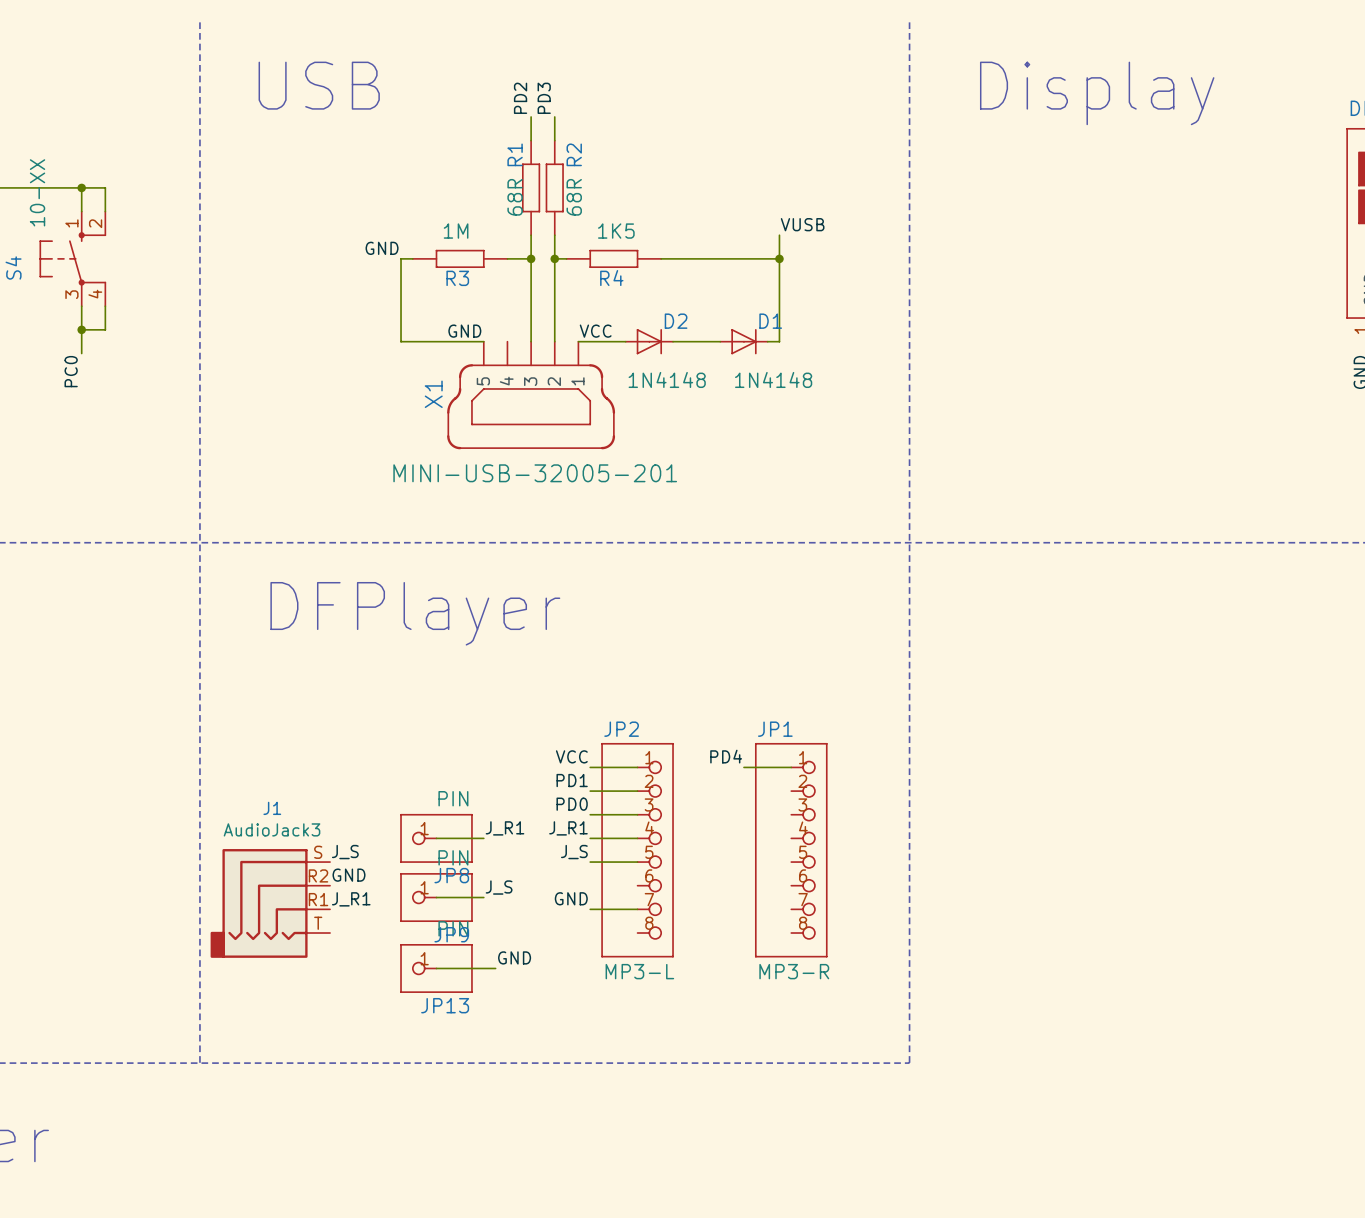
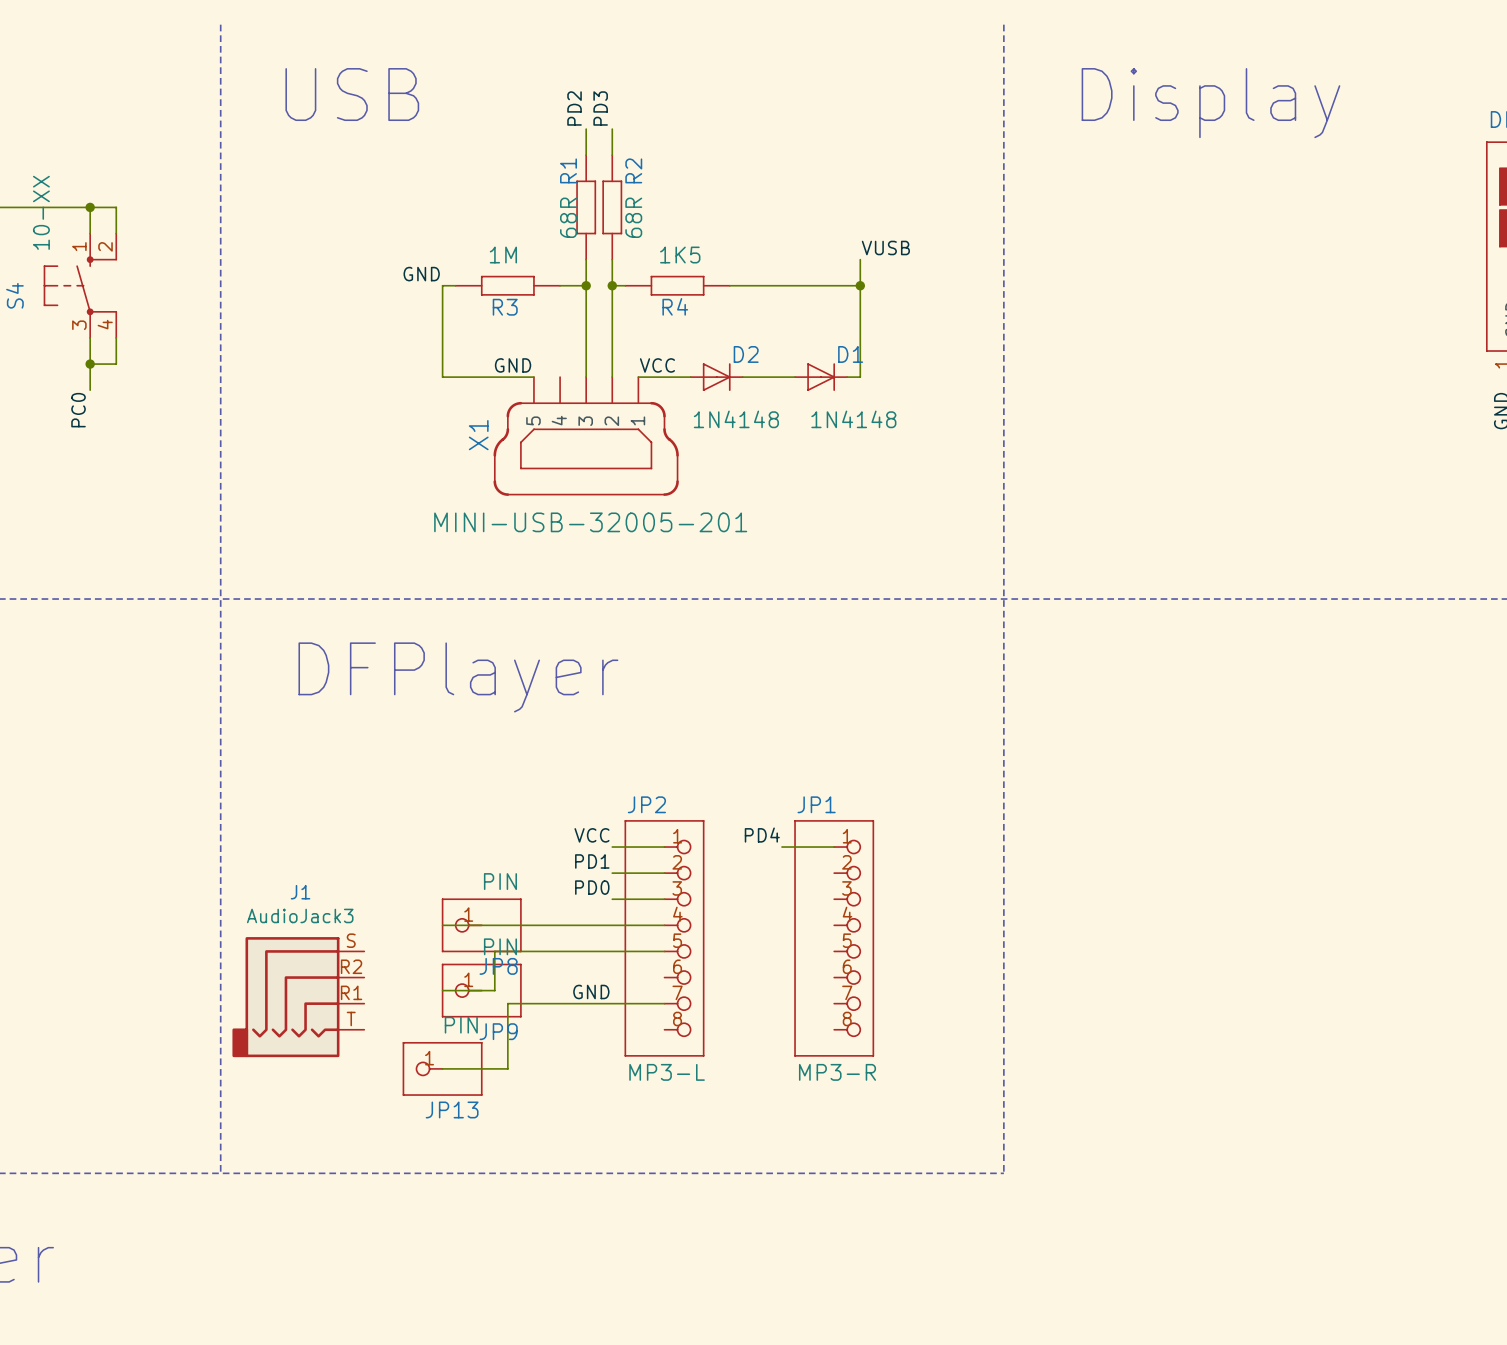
label position: VCC (571, 756) -> VCC (591, 835)
label position: PD4 (726, 756) -> PD4 (762, 835)
wire: (602, 767) (637, 767) -> (612, 847) (651, 847)
wire: (755, 767) (791, 767) -> (781, 847) (821, 847)
label position: PD1 (572, 780) -> PD1 (592, 861)
wire: (602, 791) (637, 791) -> (612, 873) (651, 873)
label position: PD0 (572, 804) -> PD0 (592, 887)
wire: (602, 814) (637, 814) -> (612, 899) (651, 899)
label: J_R1 (505, 828) -> none
label: J_R1 (568, 828) -> none
wire: none -> (533, 925) (651, 925)
wire: (602, 838) (637, 838) -> (442, 925) (481, 925)
JP2 position: (637, 850) -> (664, 938)
JP1 position: (791, 850) -> (834, 938)
label: J_S (345, 852) -> none
label: J_S (574, 852) -> none
wire: (602, 862) (637, 862) -> (442, 990) (481, 990)
label: GND (349, 875) -> none
label: J_S (499, 887) -> none
wire: (448, 897) (483, 897) -> (494, 990) (494, 951) (651, 951)
label position: GND (571, 898) -> GND (591, 992)
label: J_R1 (351, 899) -> none
wire: (602, 909) (637, 909) -> (442, 1068) (481, 1068)
label: GND (514, 957) -> none
JP13 position: (436, 968) -> (442, 1068)
wire: (460, 968) (495, 968) -> (507, 1068) (507, 1003) (651, 1003)

